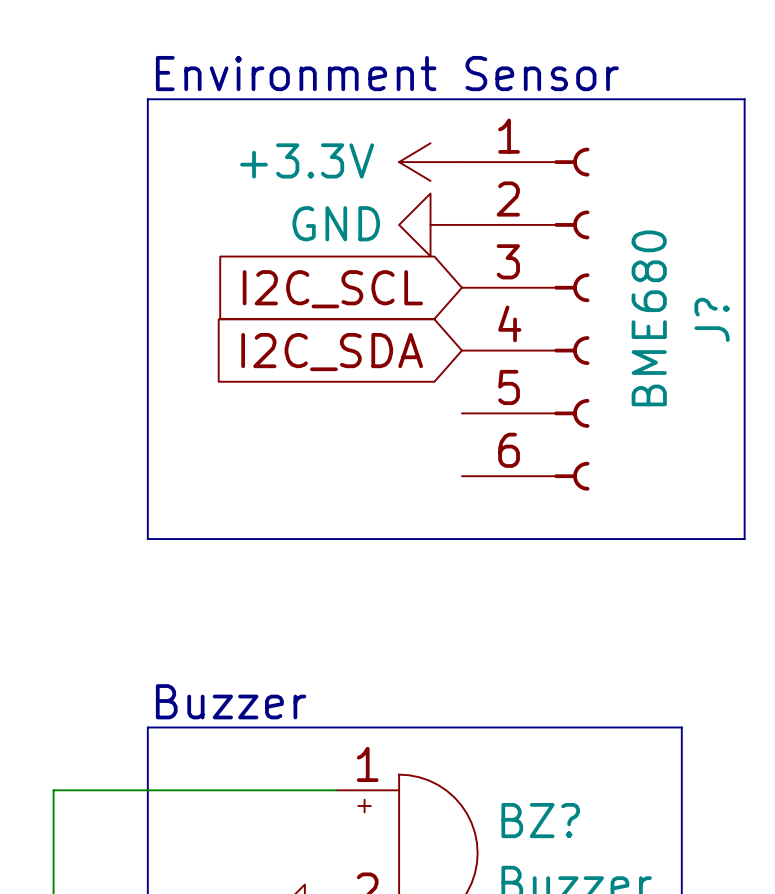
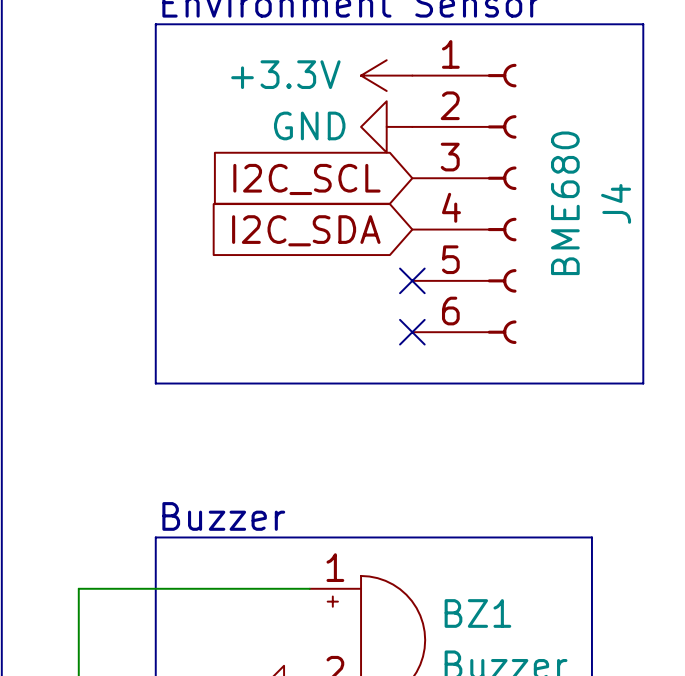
J? name: J? (712, 319) -> J4 (616, 203)
no-connect mark: none -> (412, 280)
no-connect mark: none -> (412, 332)
BZ? name: BZ? (540, 820) -> BZ1 (477, 613)

